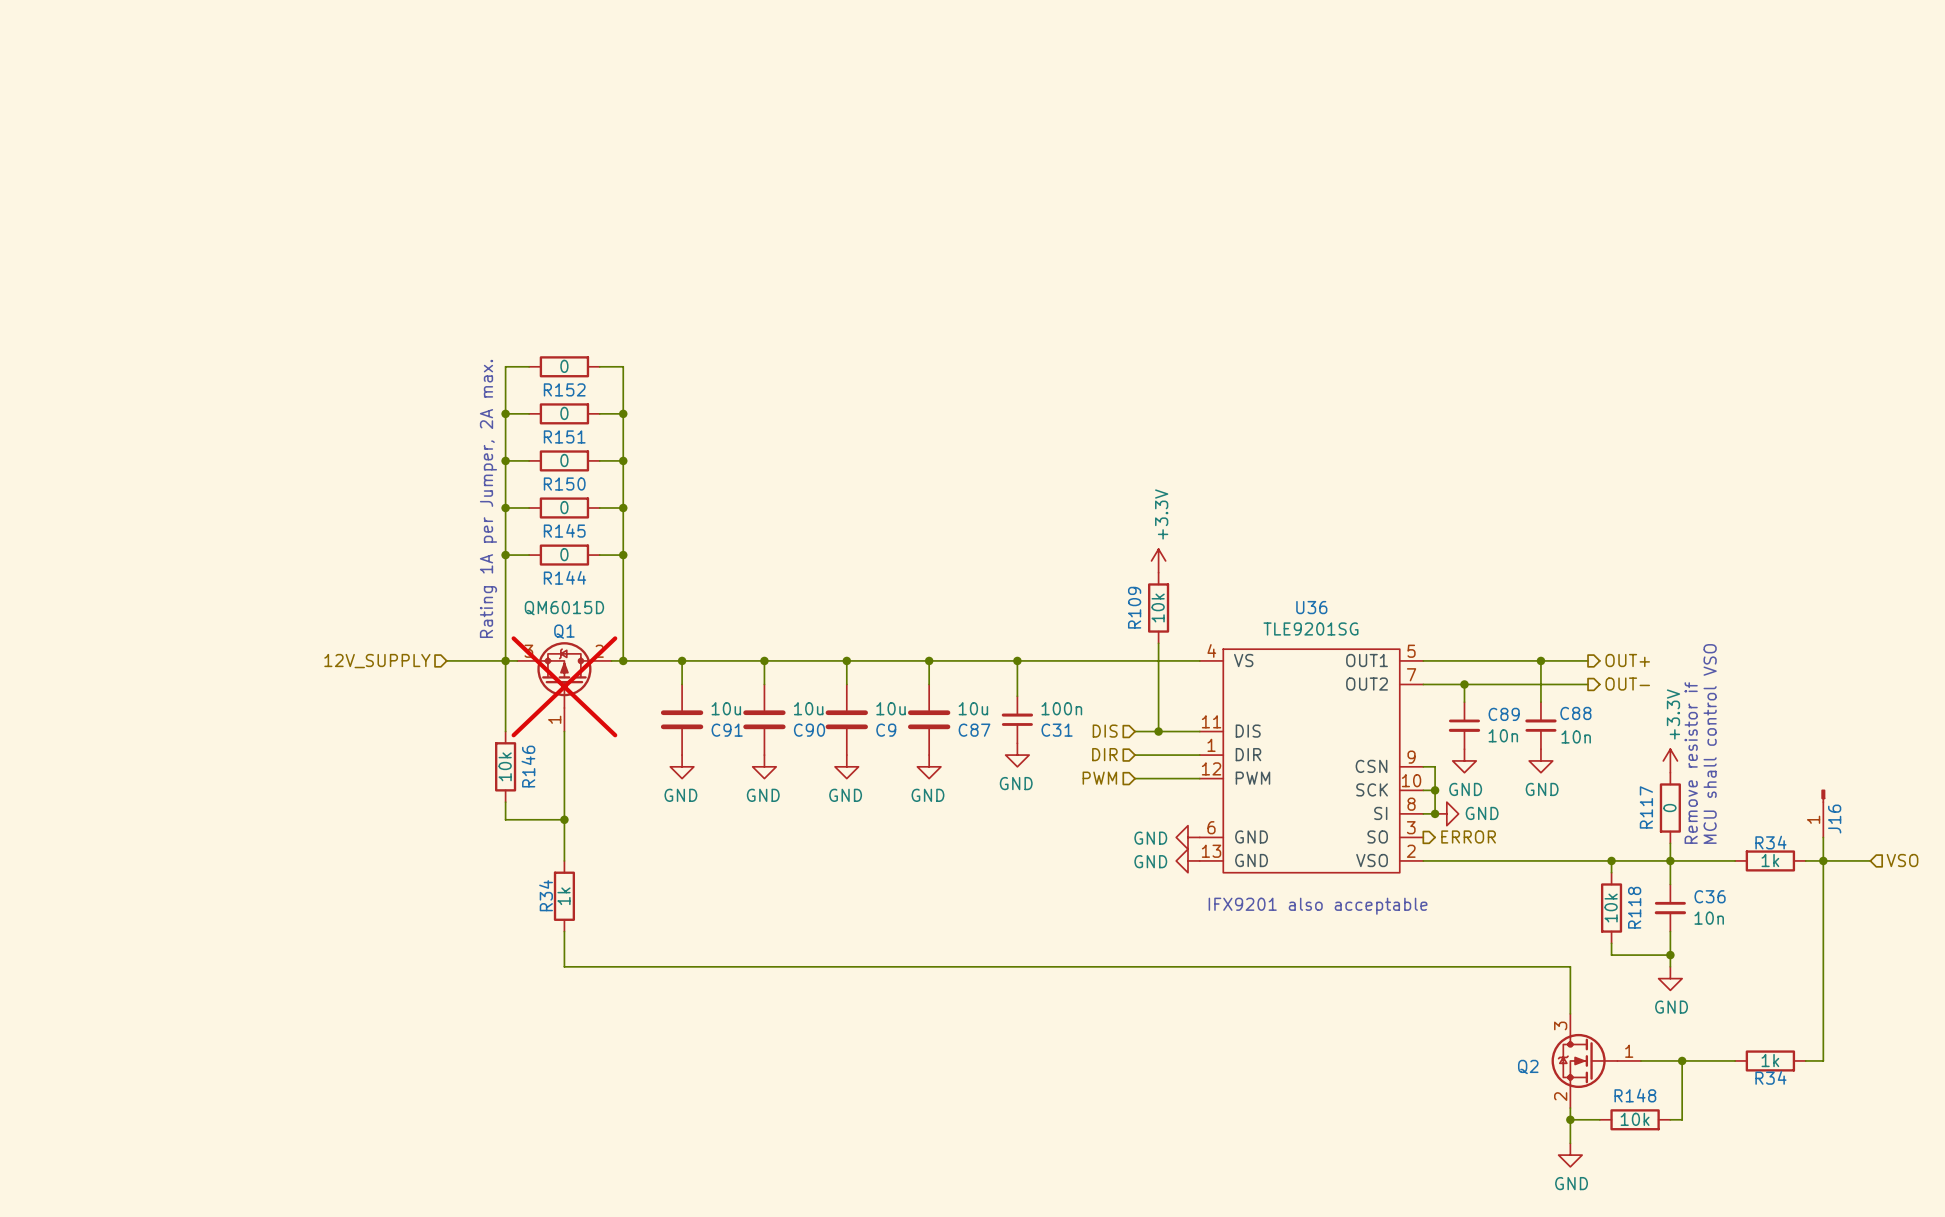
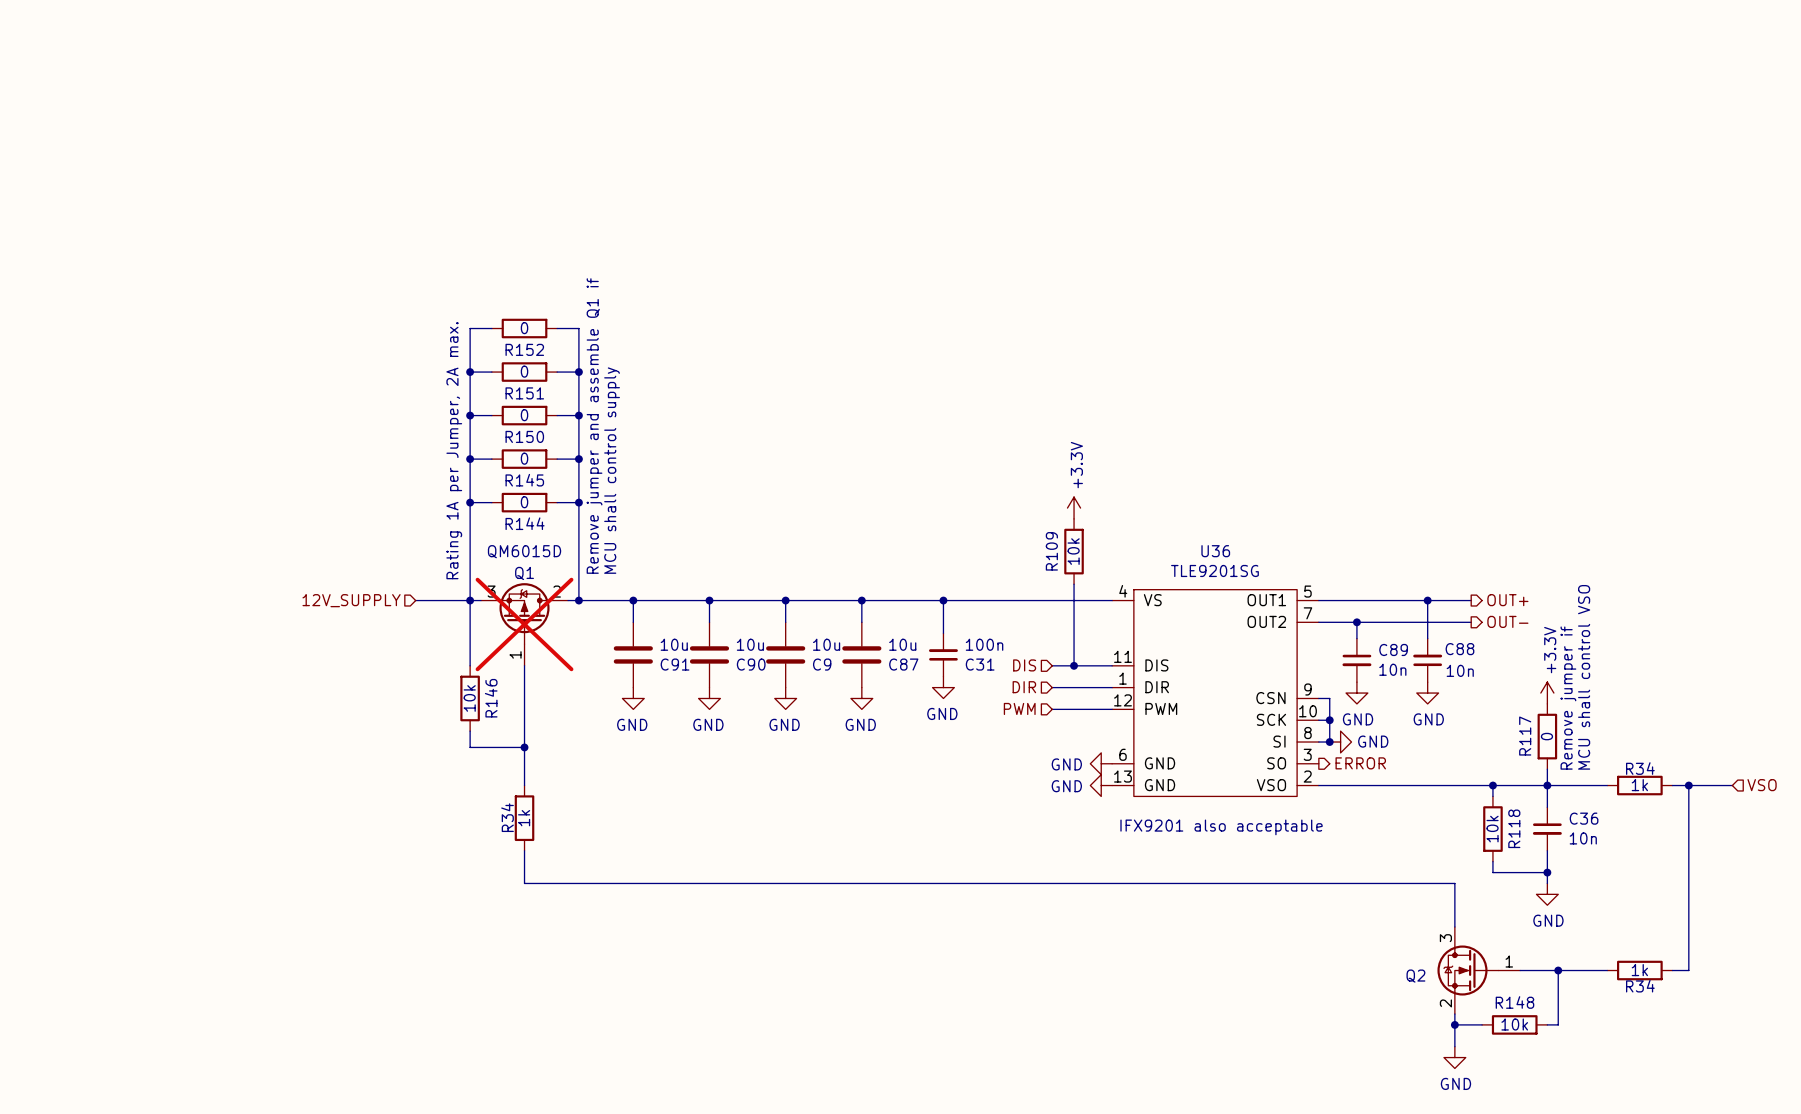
text: none -> Remove jumper and assemble Q1 if (594, 426)
text: none -> MCU shall control supply (612, 470)
text: Remove resistor if (1691, 763) -> Remove jumper if (1568, 698)
J16: (1823, 813) -> none
wire: (1823, 837) (1823, 860) -> none

